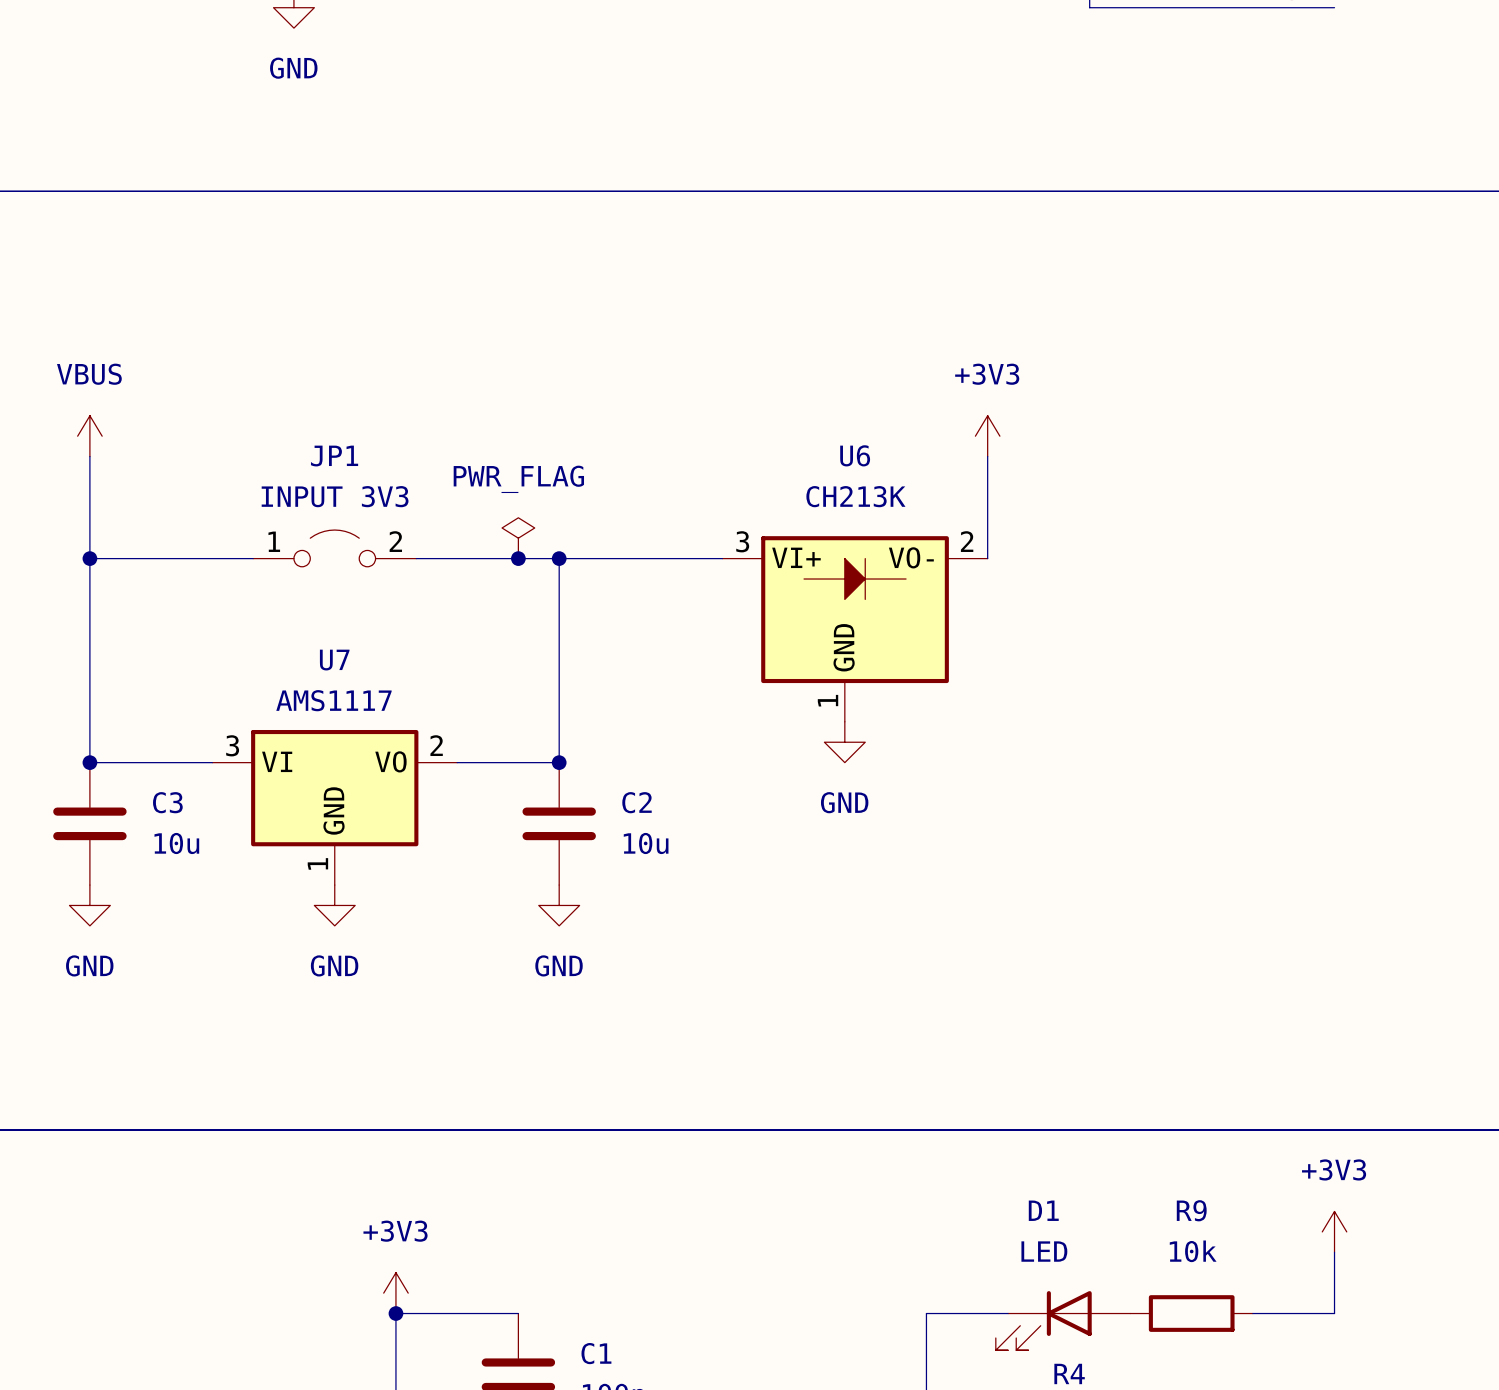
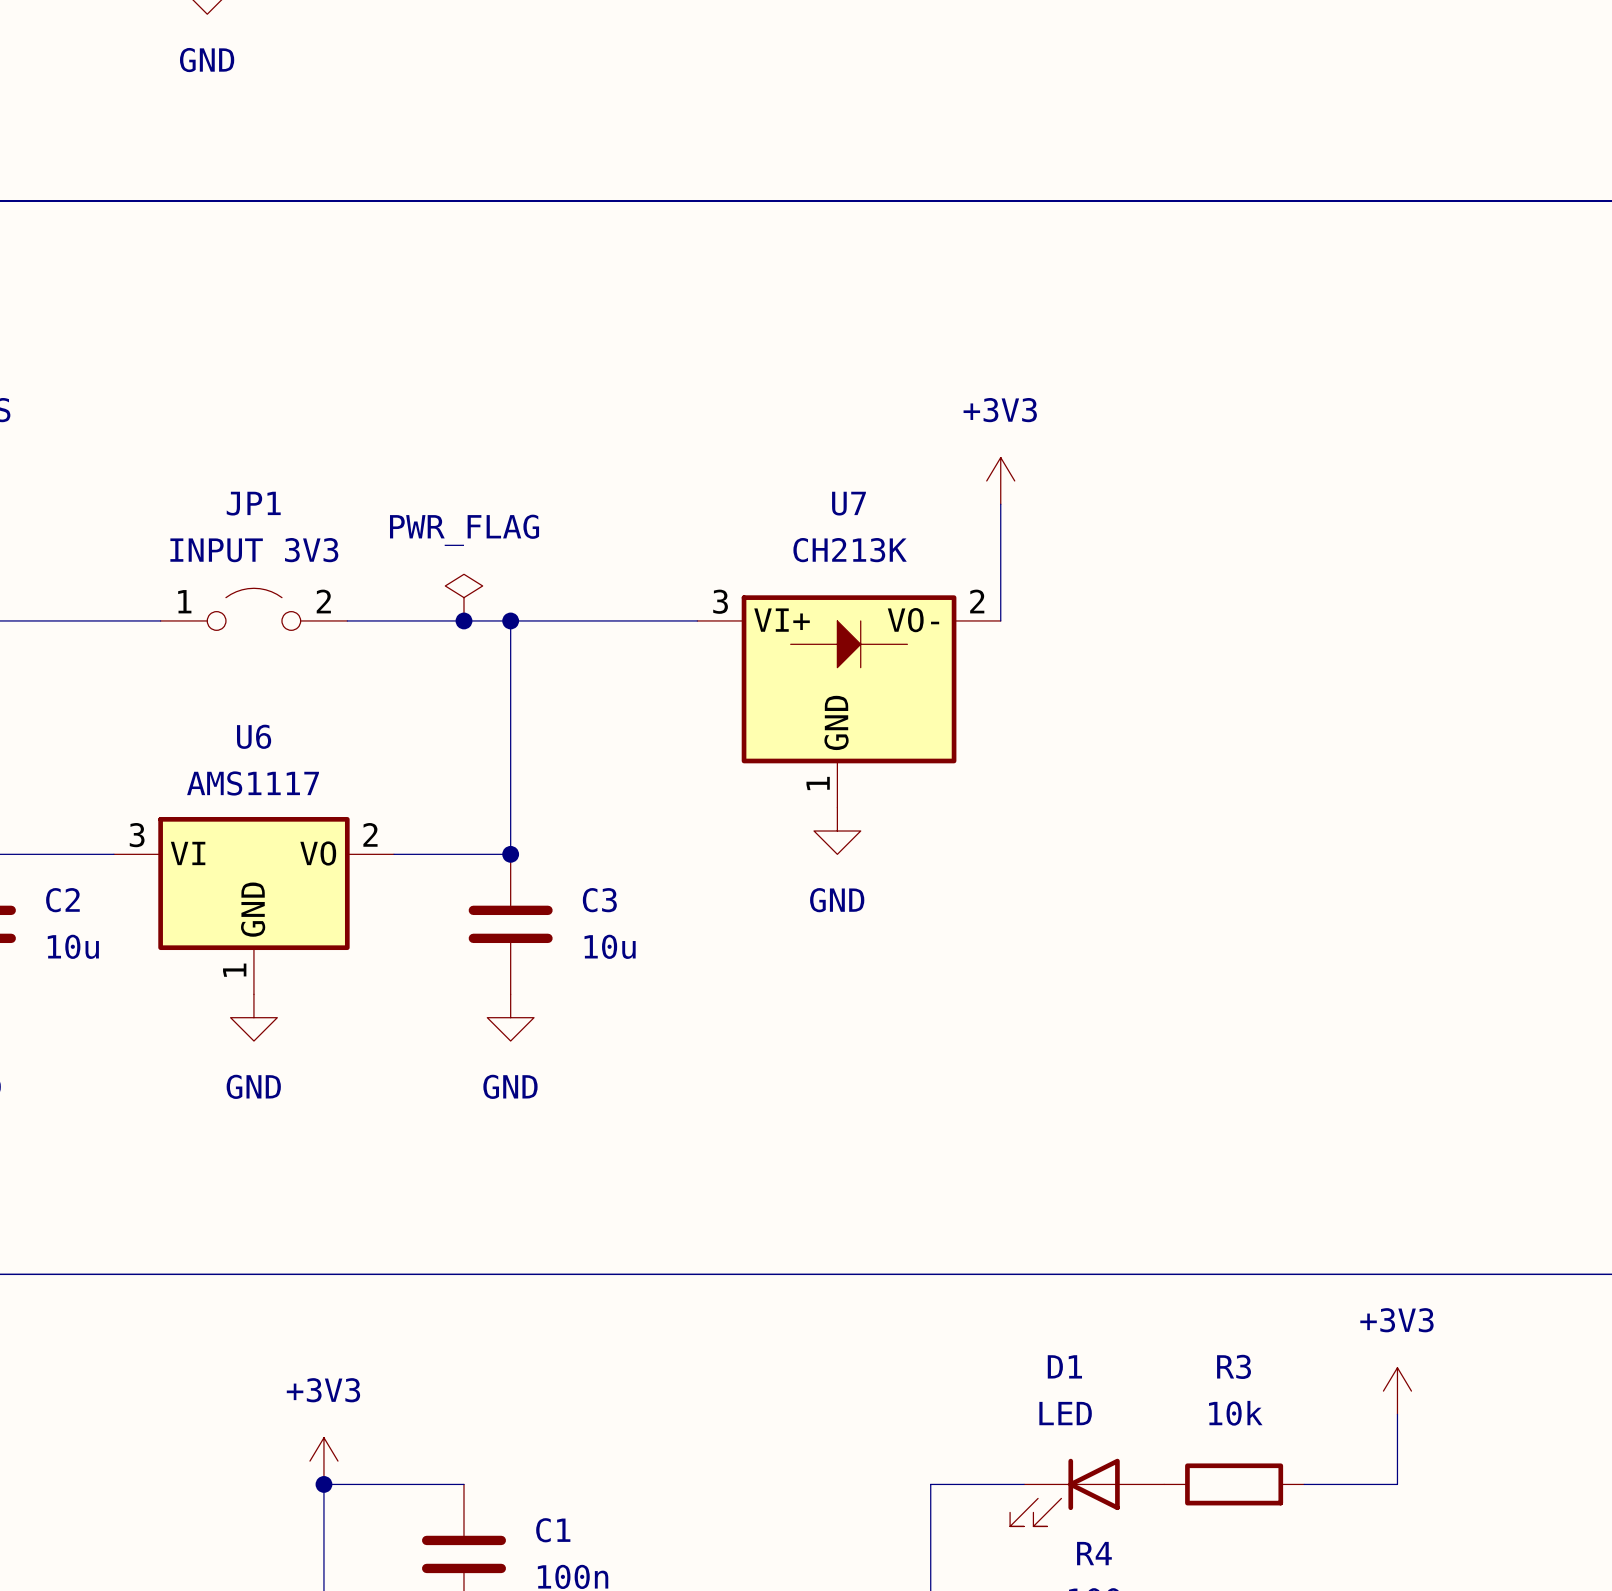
U6 name: U6 (855, 455) -> U7 (848, 503)
U7 name: U7 (334, 660) -> U6 (254, 736)
C3 name: C3 (167, 802) -> C2 (62, 900)
C2 name: C2 (637, 802) -> C3 (599, 900)
R9 name: R9 (1191, 1210) -> R3 (1234, 1366)

